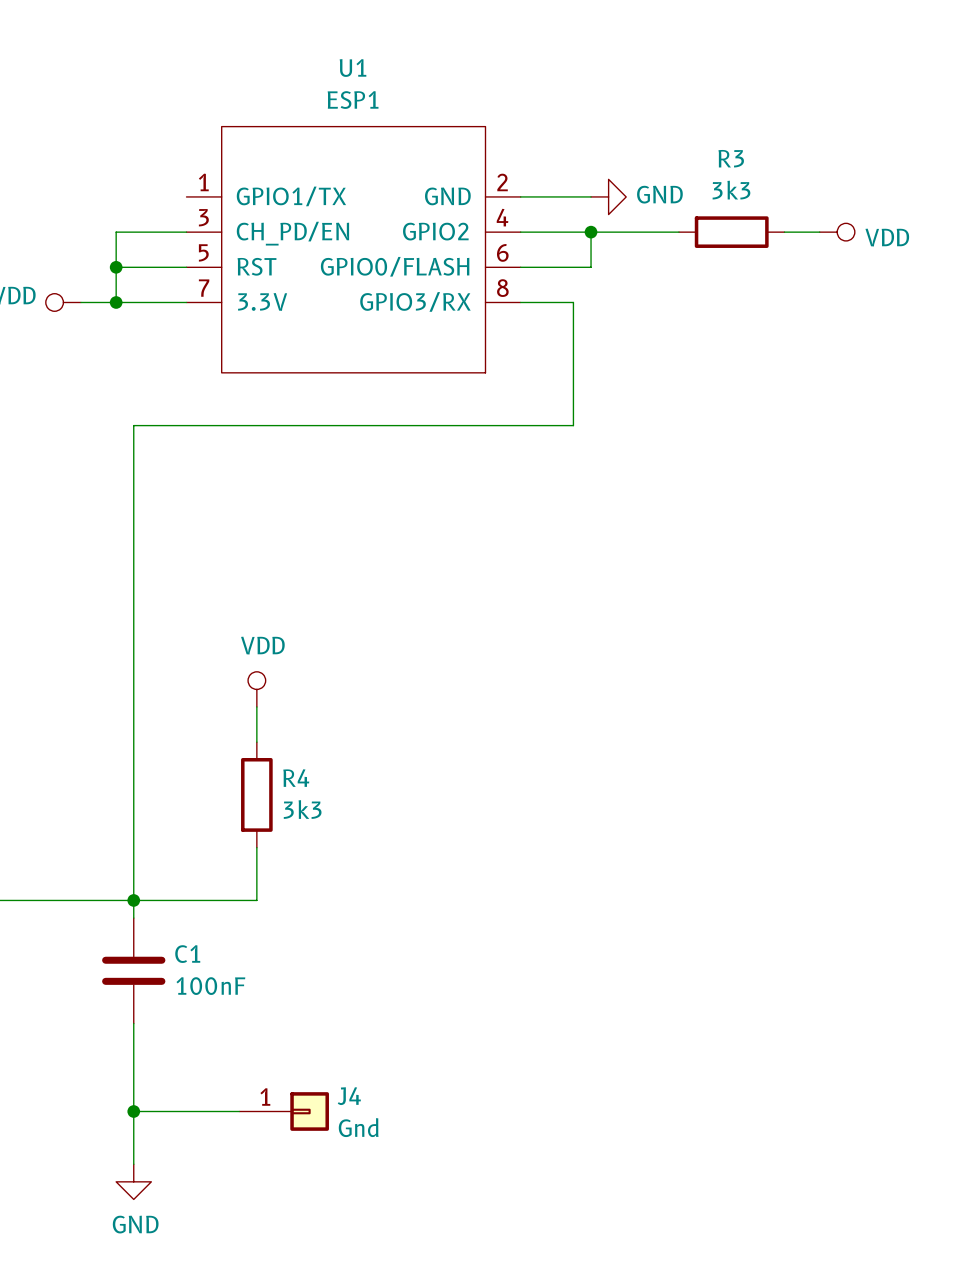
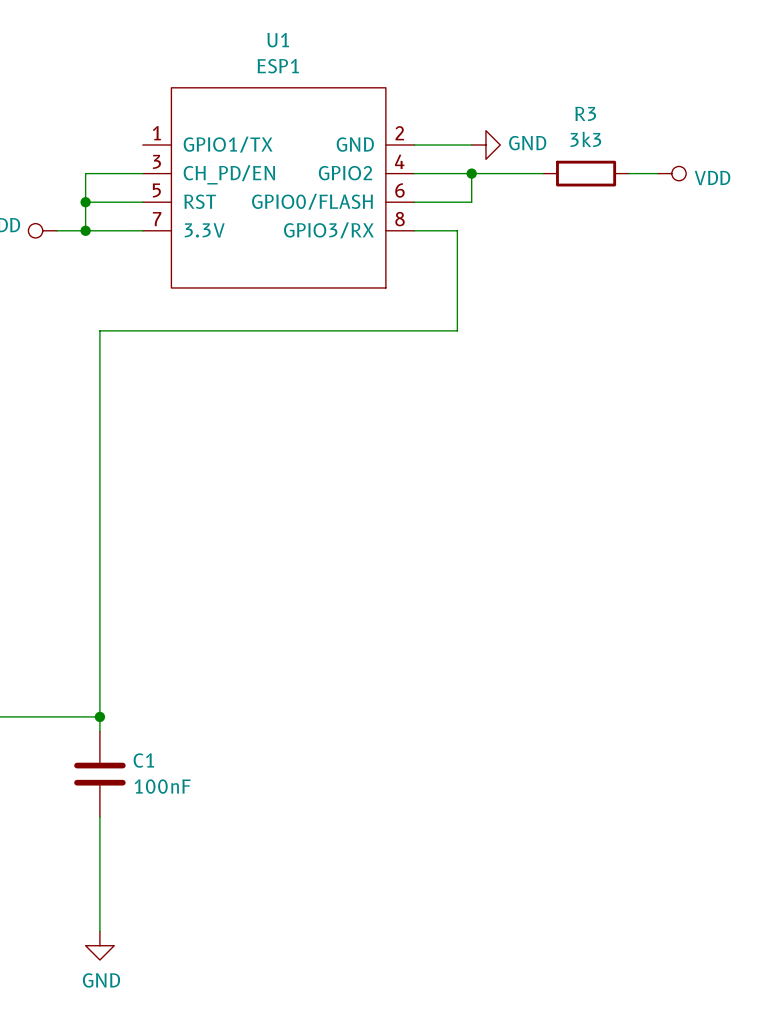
power symbol: VDD (256, 689) -> none
wire: (256, 706) (256, 742) -> none
R4: 3k3 (256, 794) -> none
wire: (256, 847) (256, 900) (133, 900) -> none
wire: (133, 1111) (239, 1111) -> none
junction: (133, 1111) -> none
J4: Gnd (284, 1111) -> none

